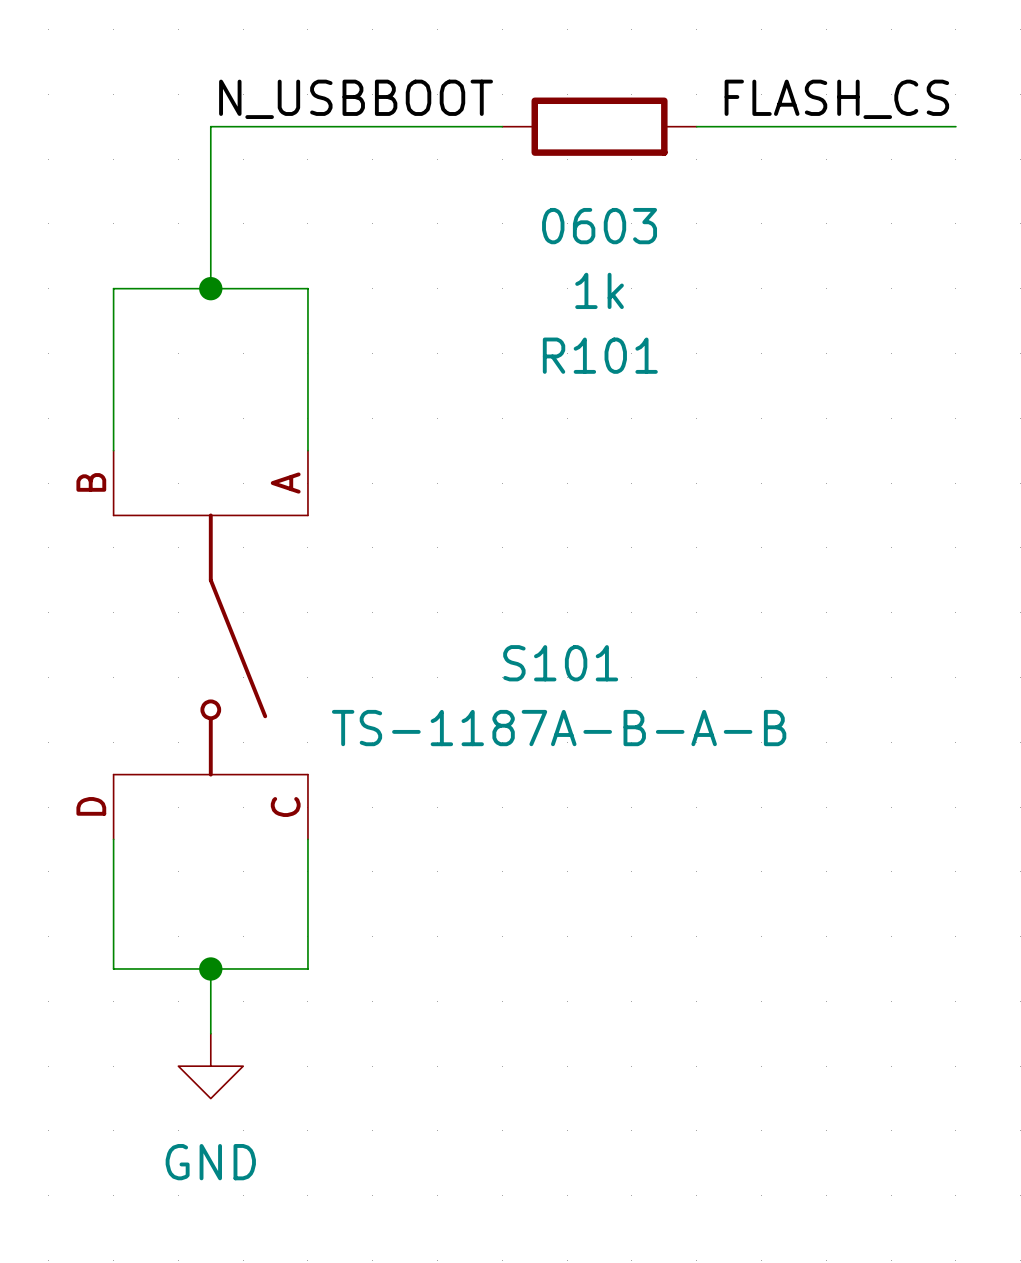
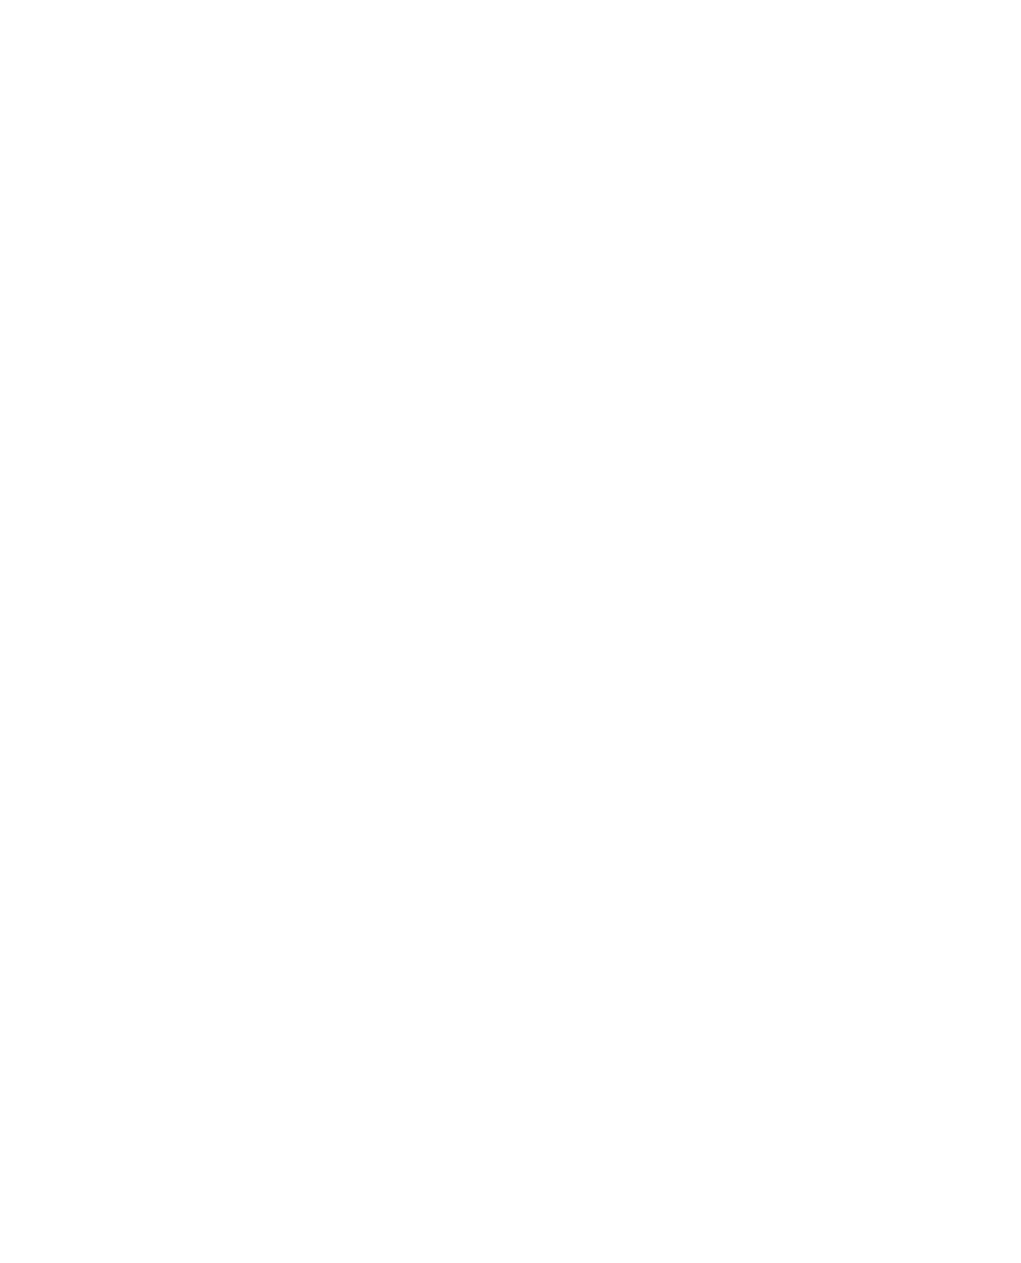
label: N_USBBOOT (356, 99) -> none
label: FLASH_CS (836, 99) -> none
wire: (502, 126) (210, 126) (210, 288) -> none
R101: 1k (599, 126) -> none
wire: (696, 126) (955, 126) -> none
junction: (210, 288) -> none
wire: (113, 450) (113, 288) (307, 288) (307, 450) -> none
S101: TS-1187A-B-A-B (210, 645) -> none
wire: (113, 839) (113, 968) (307, 968) (307, 839) -> none
wire: (210, 968) (210, 1033) -> none
junction: (210, 968) -> none
power symbol: GND (210, 1066) -> none

